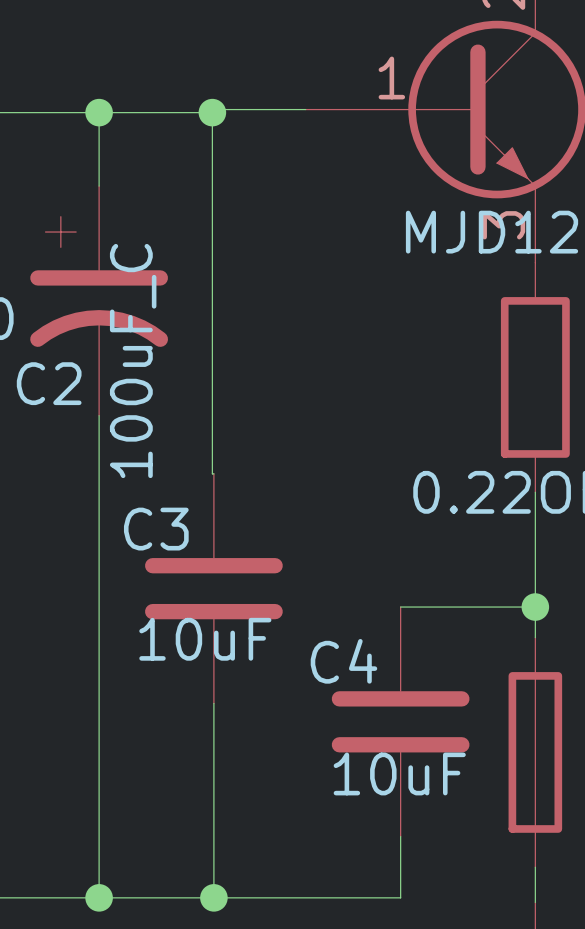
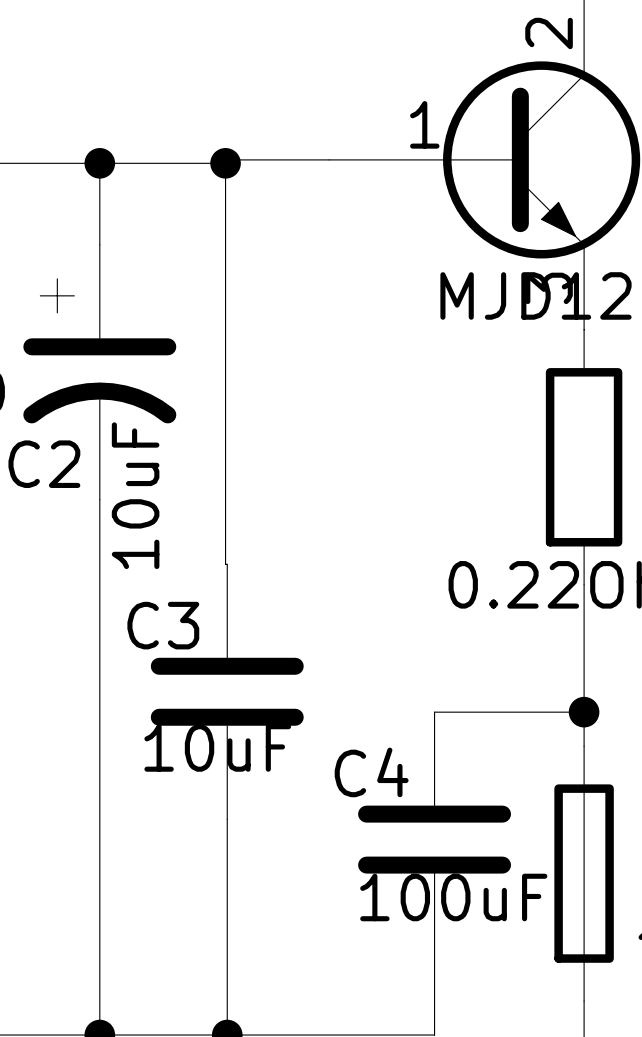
C2 value: 100uF_C (133, 361) -> 10uF (135, 495)
C4 value: 10uF (399, 773) -> 100uF (453, 897)

